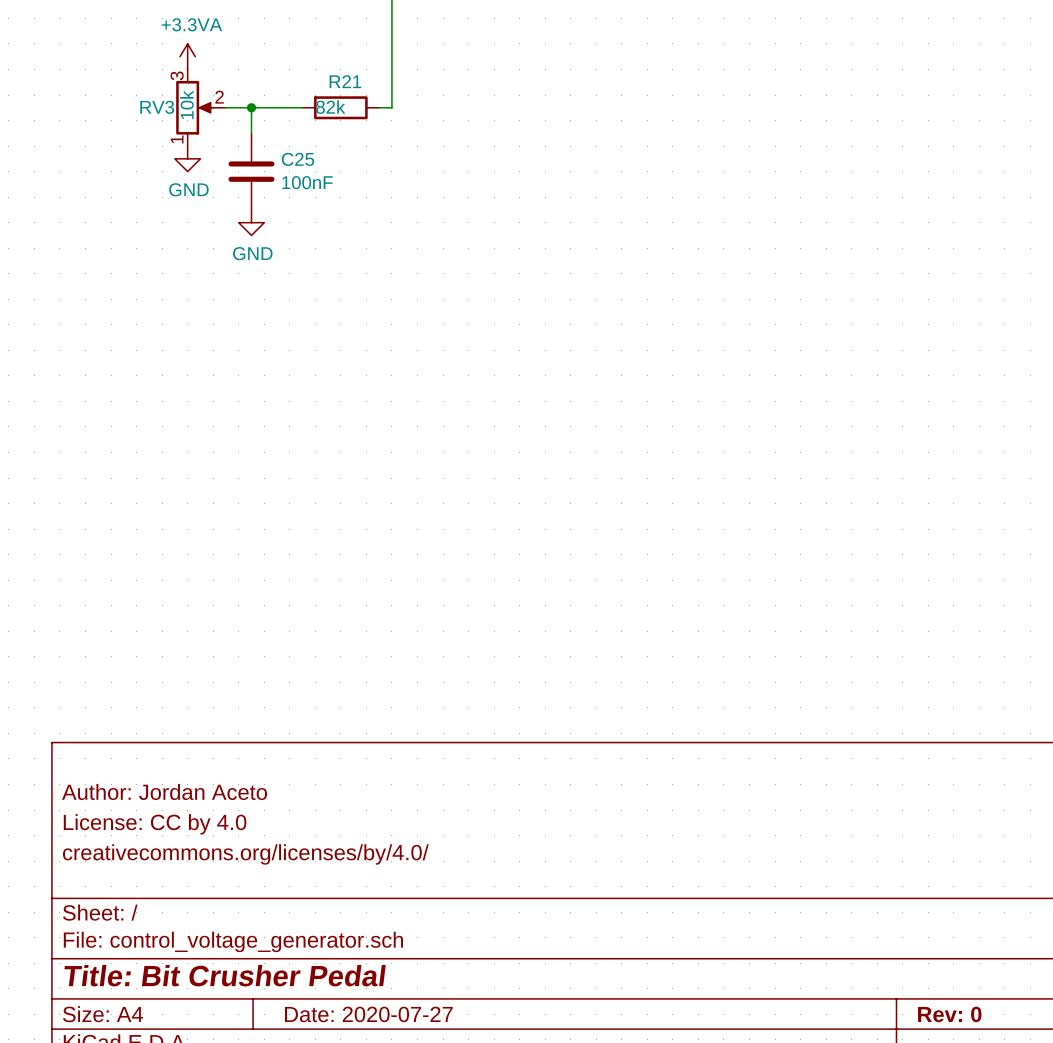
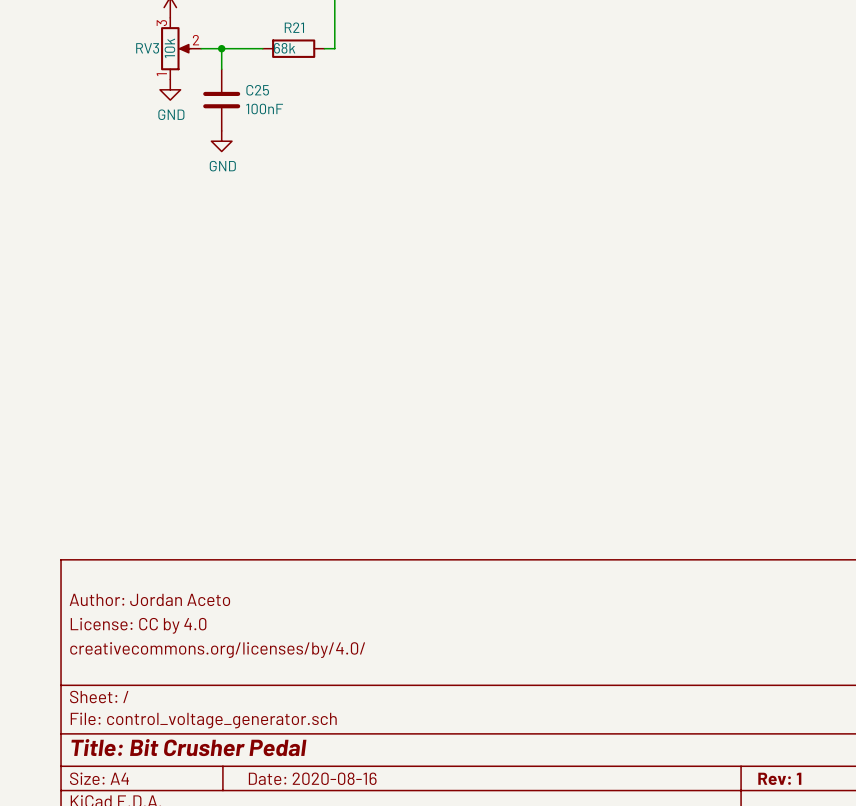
R21 value: 82k (330, 107) -> 68k (284, 48)
title block: Date: 2020-07-27 (368, 1014) -> Date: 2020-08-16 (312, 778)
title block: Rev: 0 (949, 1014) -> Rev: 1 (779, 778)

